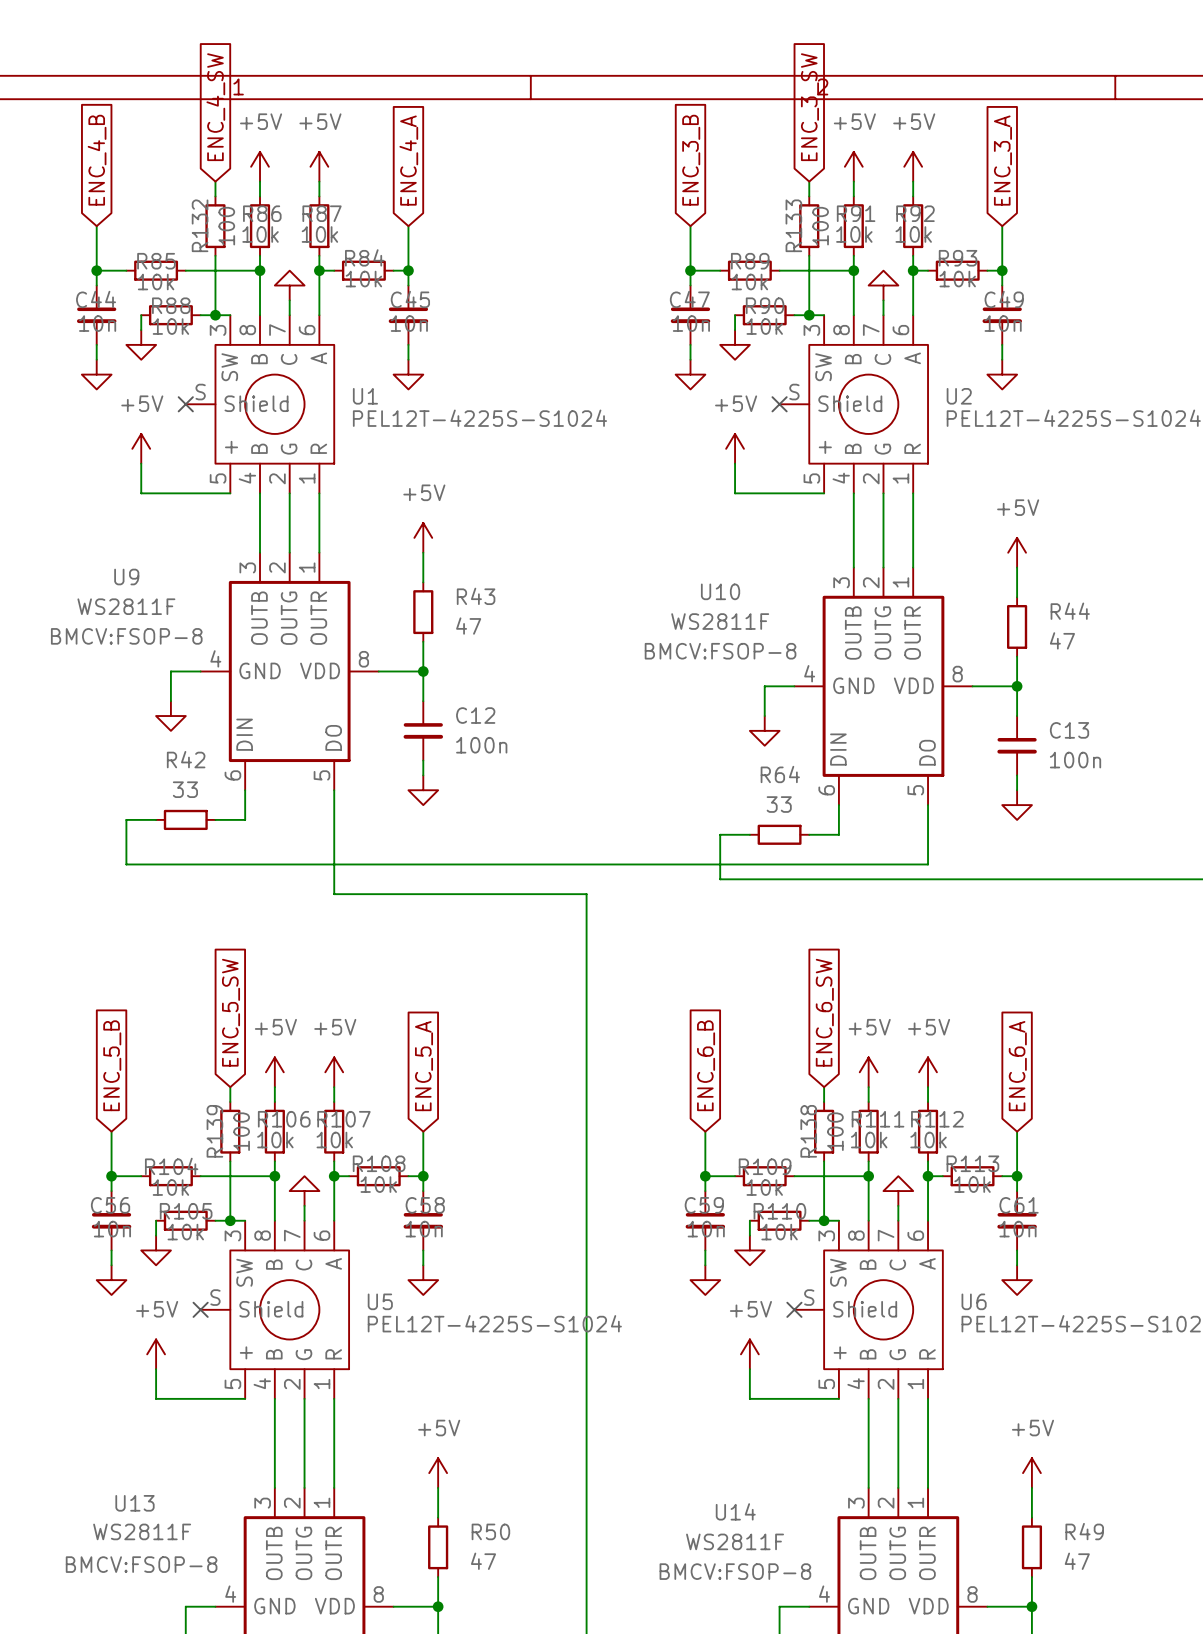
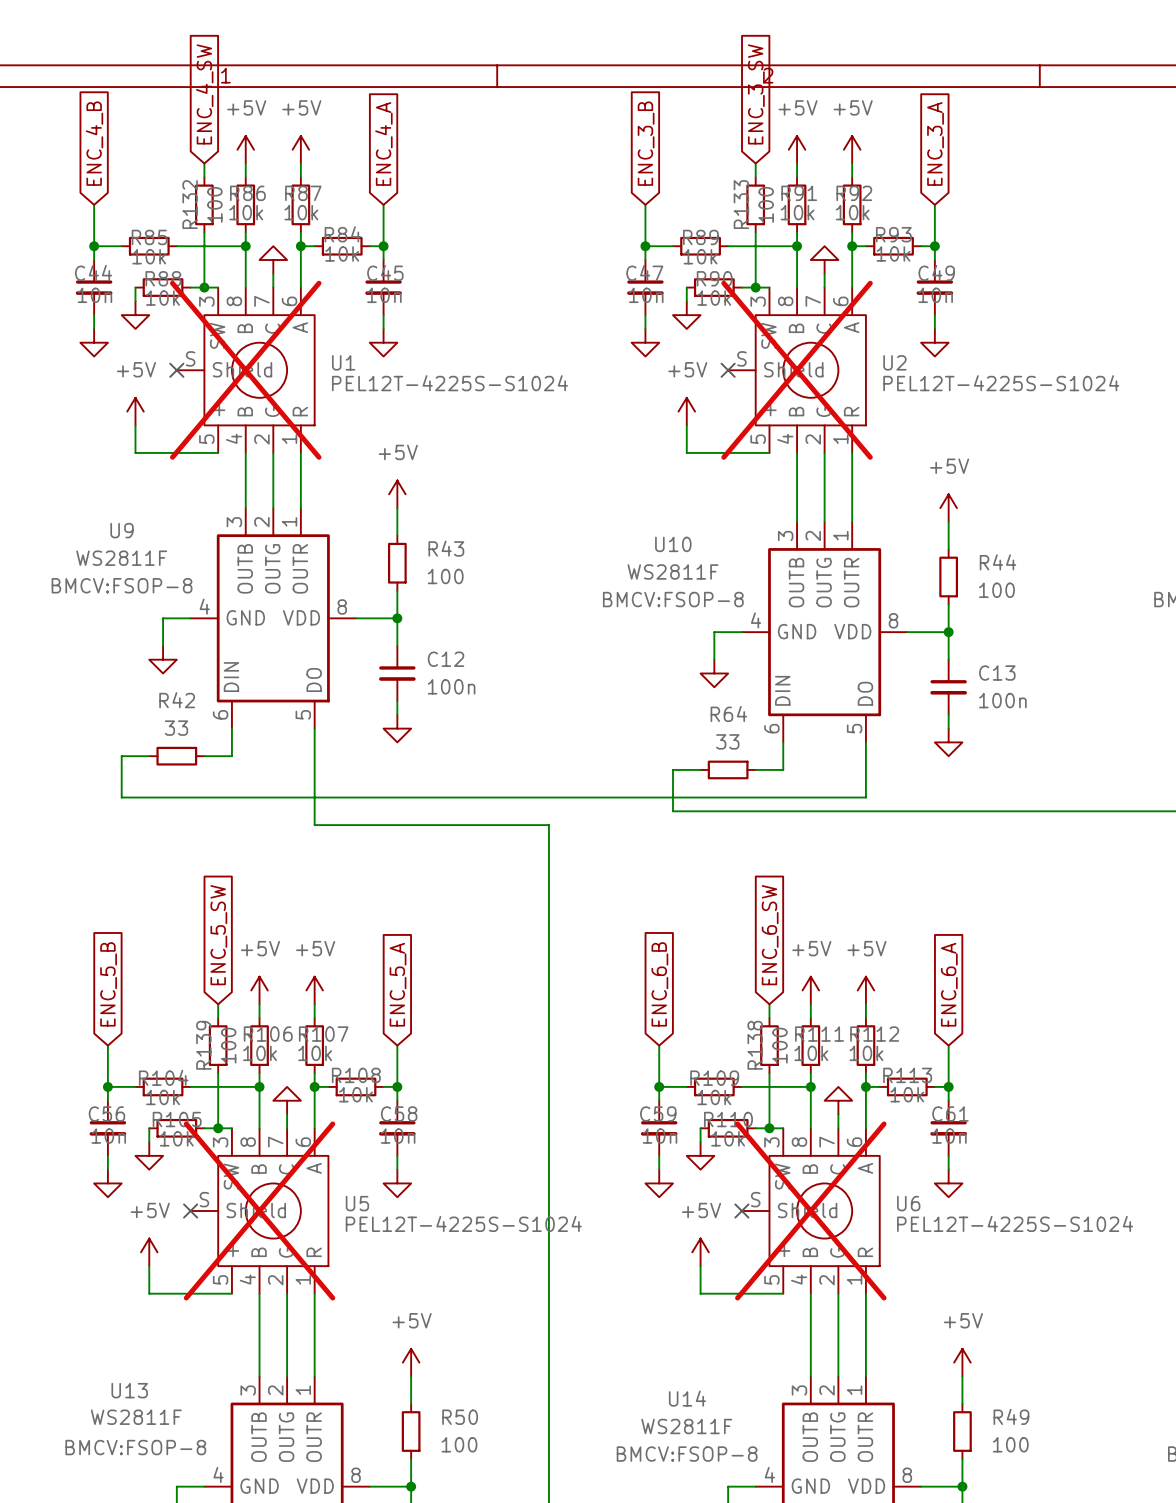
U1 do-not-place cross: none -> (245, 370)
U2 do-not-place cross: none -> (797, 370)
R43 value: 47 (468, 626) -> 100 (445, 576)
R44 value: 47 (1062, 640) -> 100 (996, 590)
U5 do-not-place cross: none -> (259, 1211)
U6 do-not-place cross: none -> (810, 1211)
R50 value: 47 (483, 1561) -> 100 (459, 1444)
R49 value: 47 (1077, 1561) -> 100 (1010, 1444)

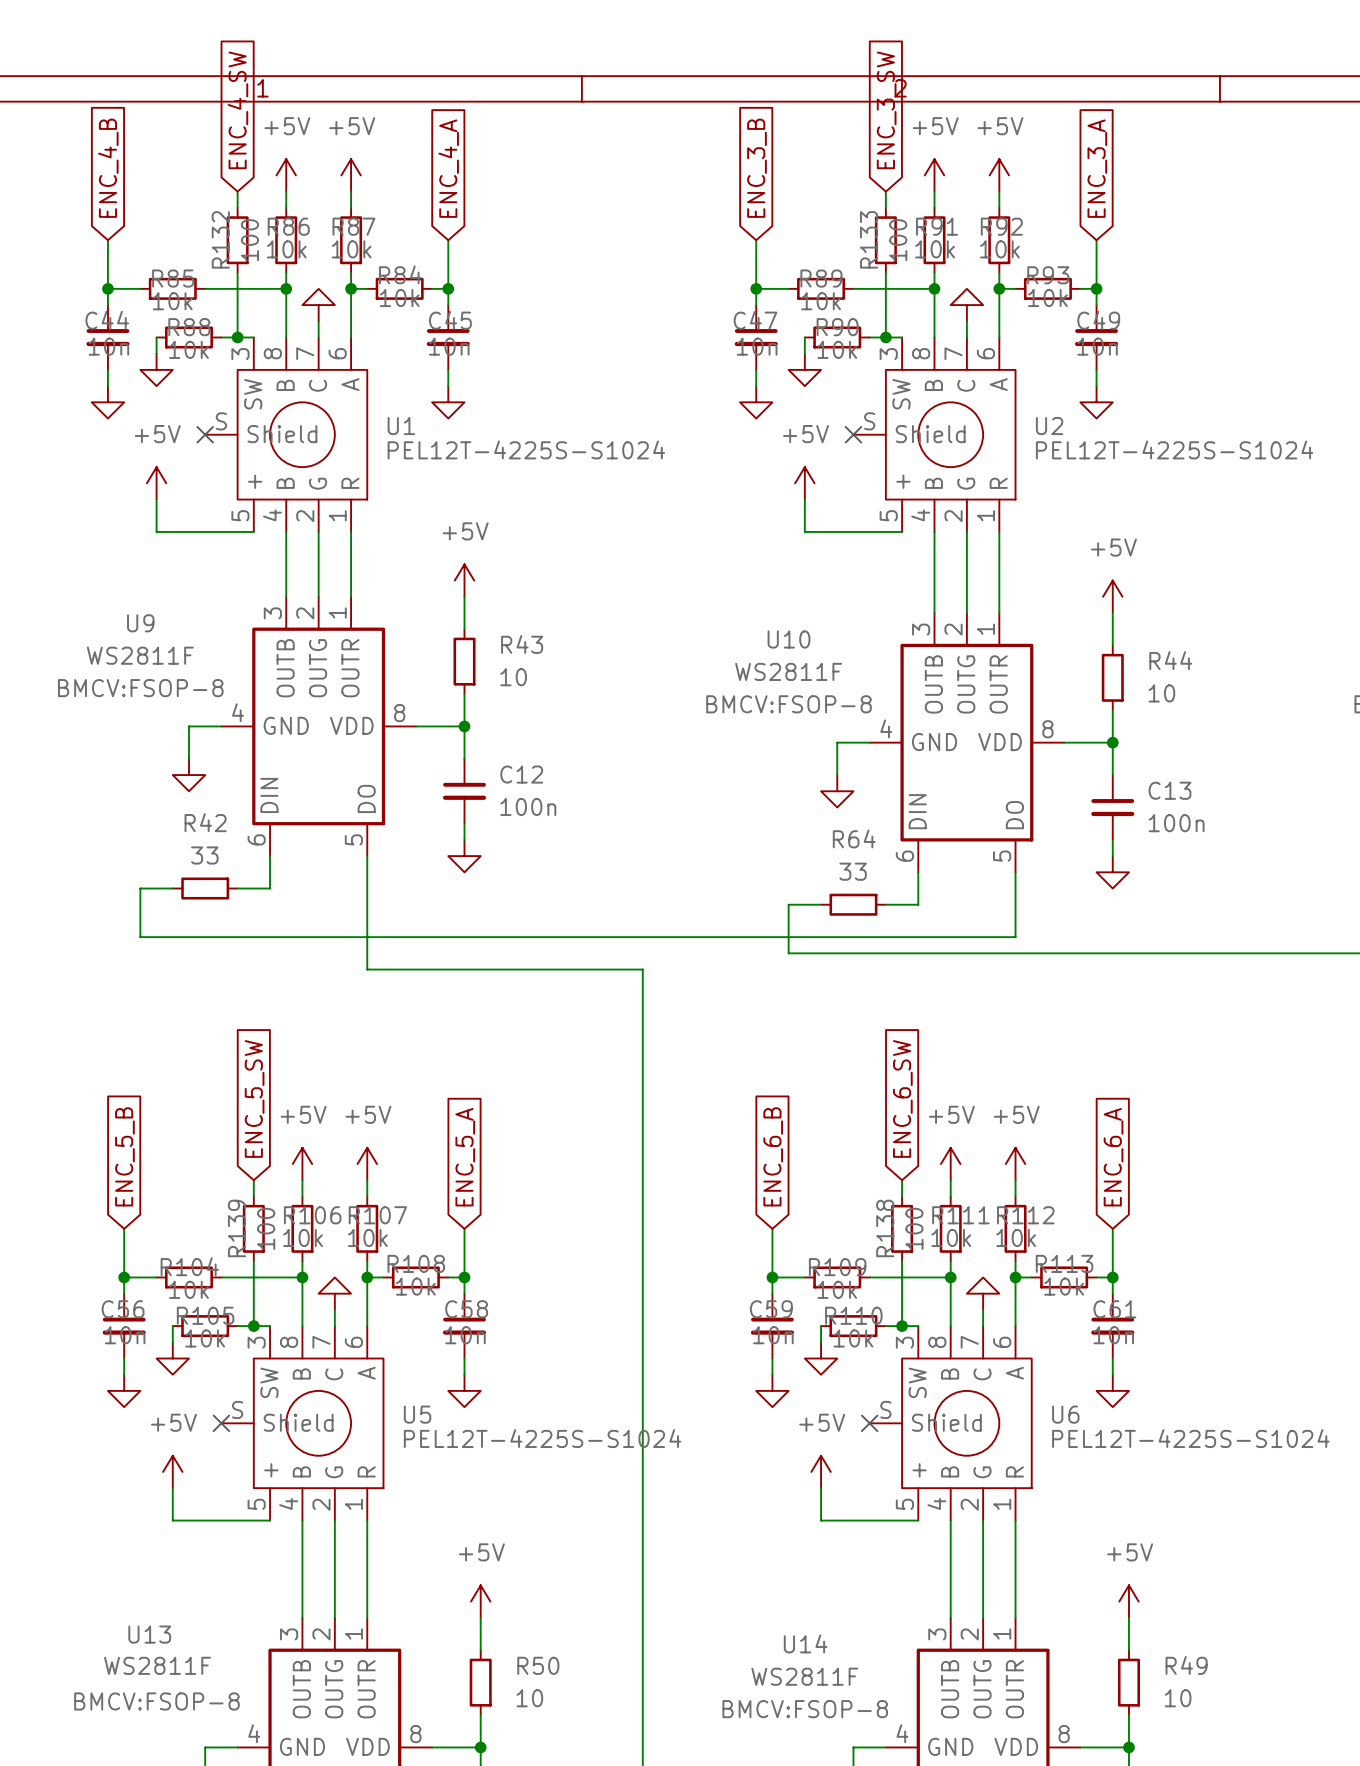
U1 do-not-place cross: (245, 370) -> none
U2 do-not-place cross: (797, 370) -> none
R43 value: 100 (445, 576) -> 10 (513, 677)
R44 value: 100 (996, 590) -> 10 (1161, 693)
U5 do-not-place cross: (259, 1211) -> none
U6 do-not-place cross: (810, 1211) -> none
R50 value: 100 (459, 1444) -> 10 (529, 1698)
R49 value: 100 (1010, 1444) -> 10 (1178, 1698)

